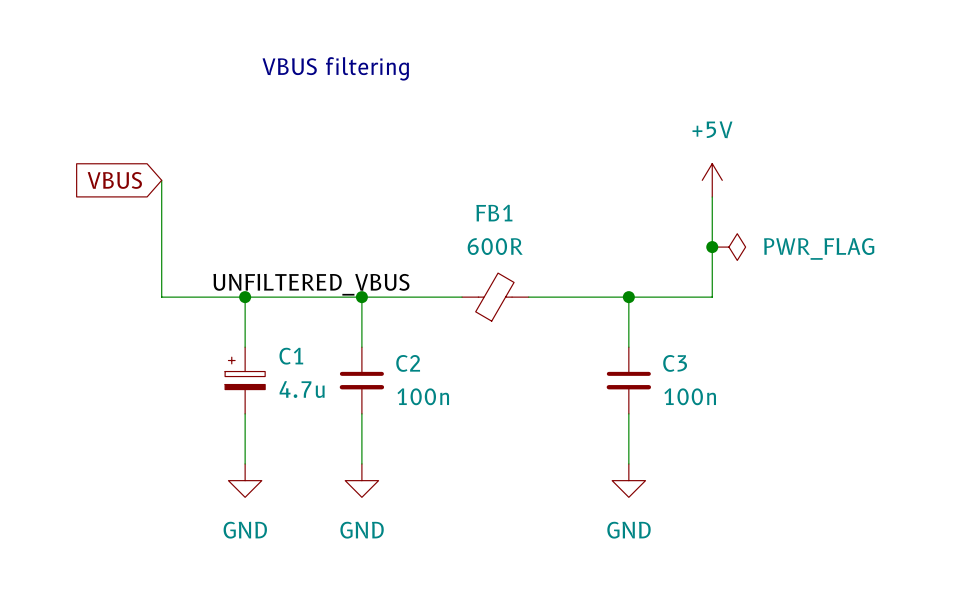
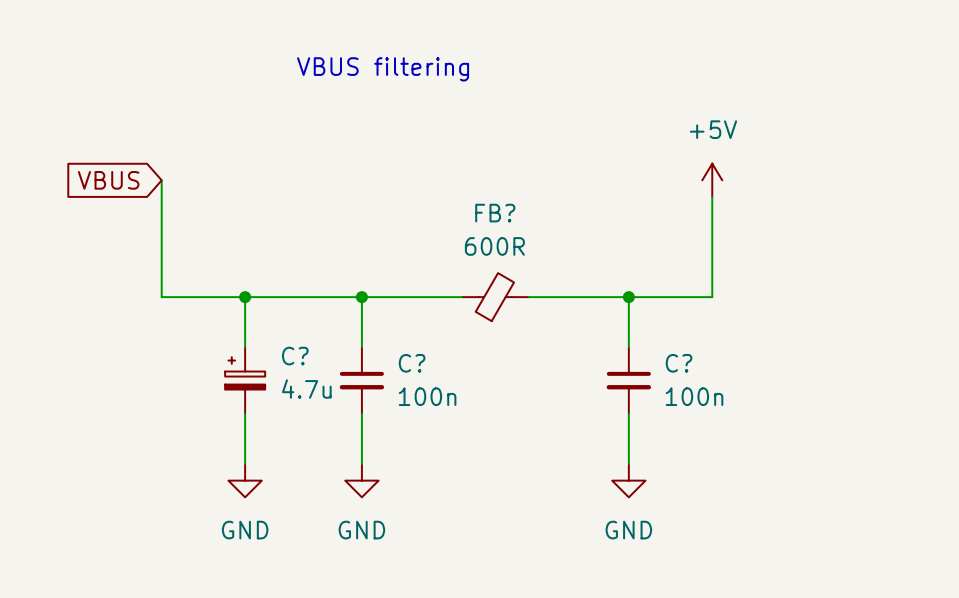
text position: VBUS filtering (335, 68) -> VBUS filtering (383, 69)
FB1 name: FB1 (494, 213) -> FB? (495, 213)
junction: (712, 247) -> none
power symbol: PWR_FLAG (728, 247) -> none
label: UNFILTERED_VBUS (311, 284) -> none
C1 name: C1 (291, 356) -> C? (295, 356)
C2 name: C2 (408, 363) -> C? (412, 363)
C3 name: C3 (675, 363) -> C? (679, 363)

